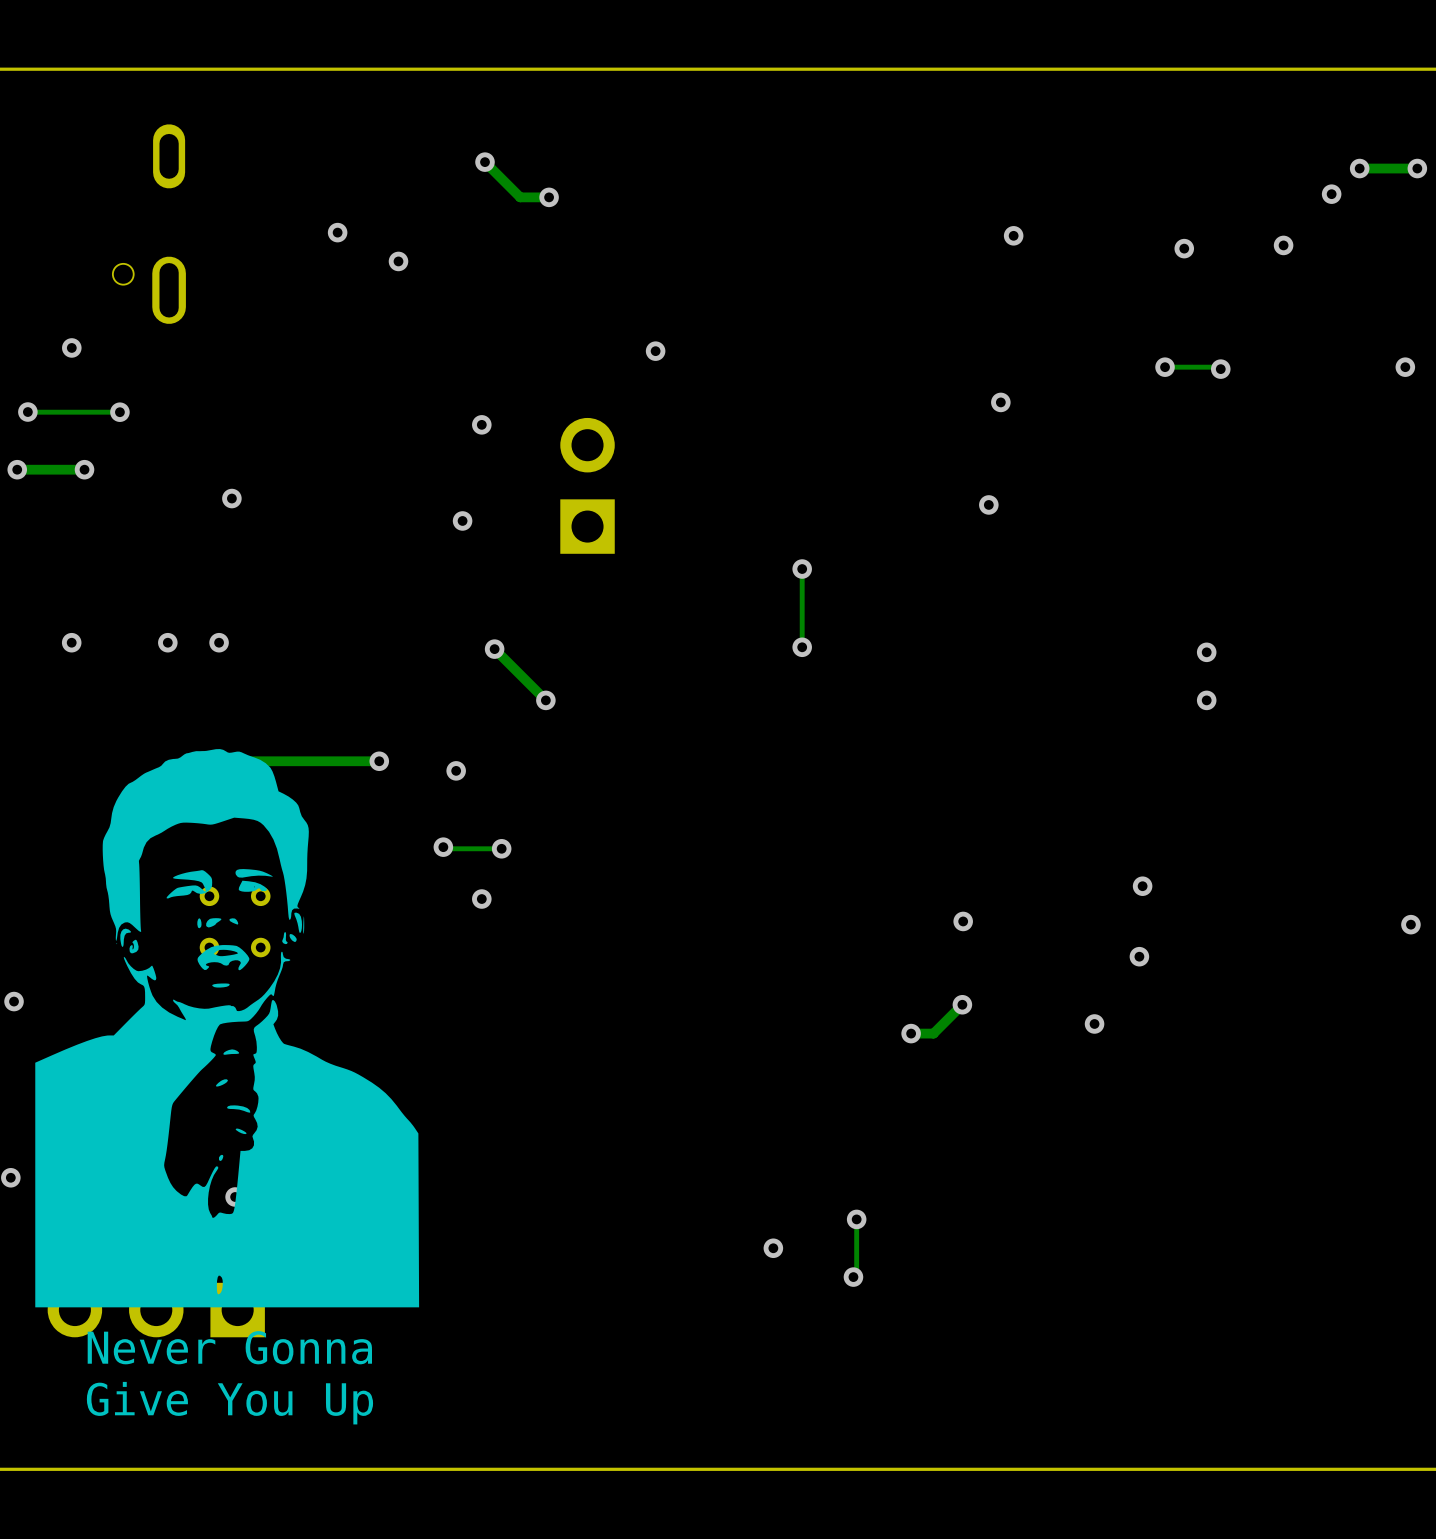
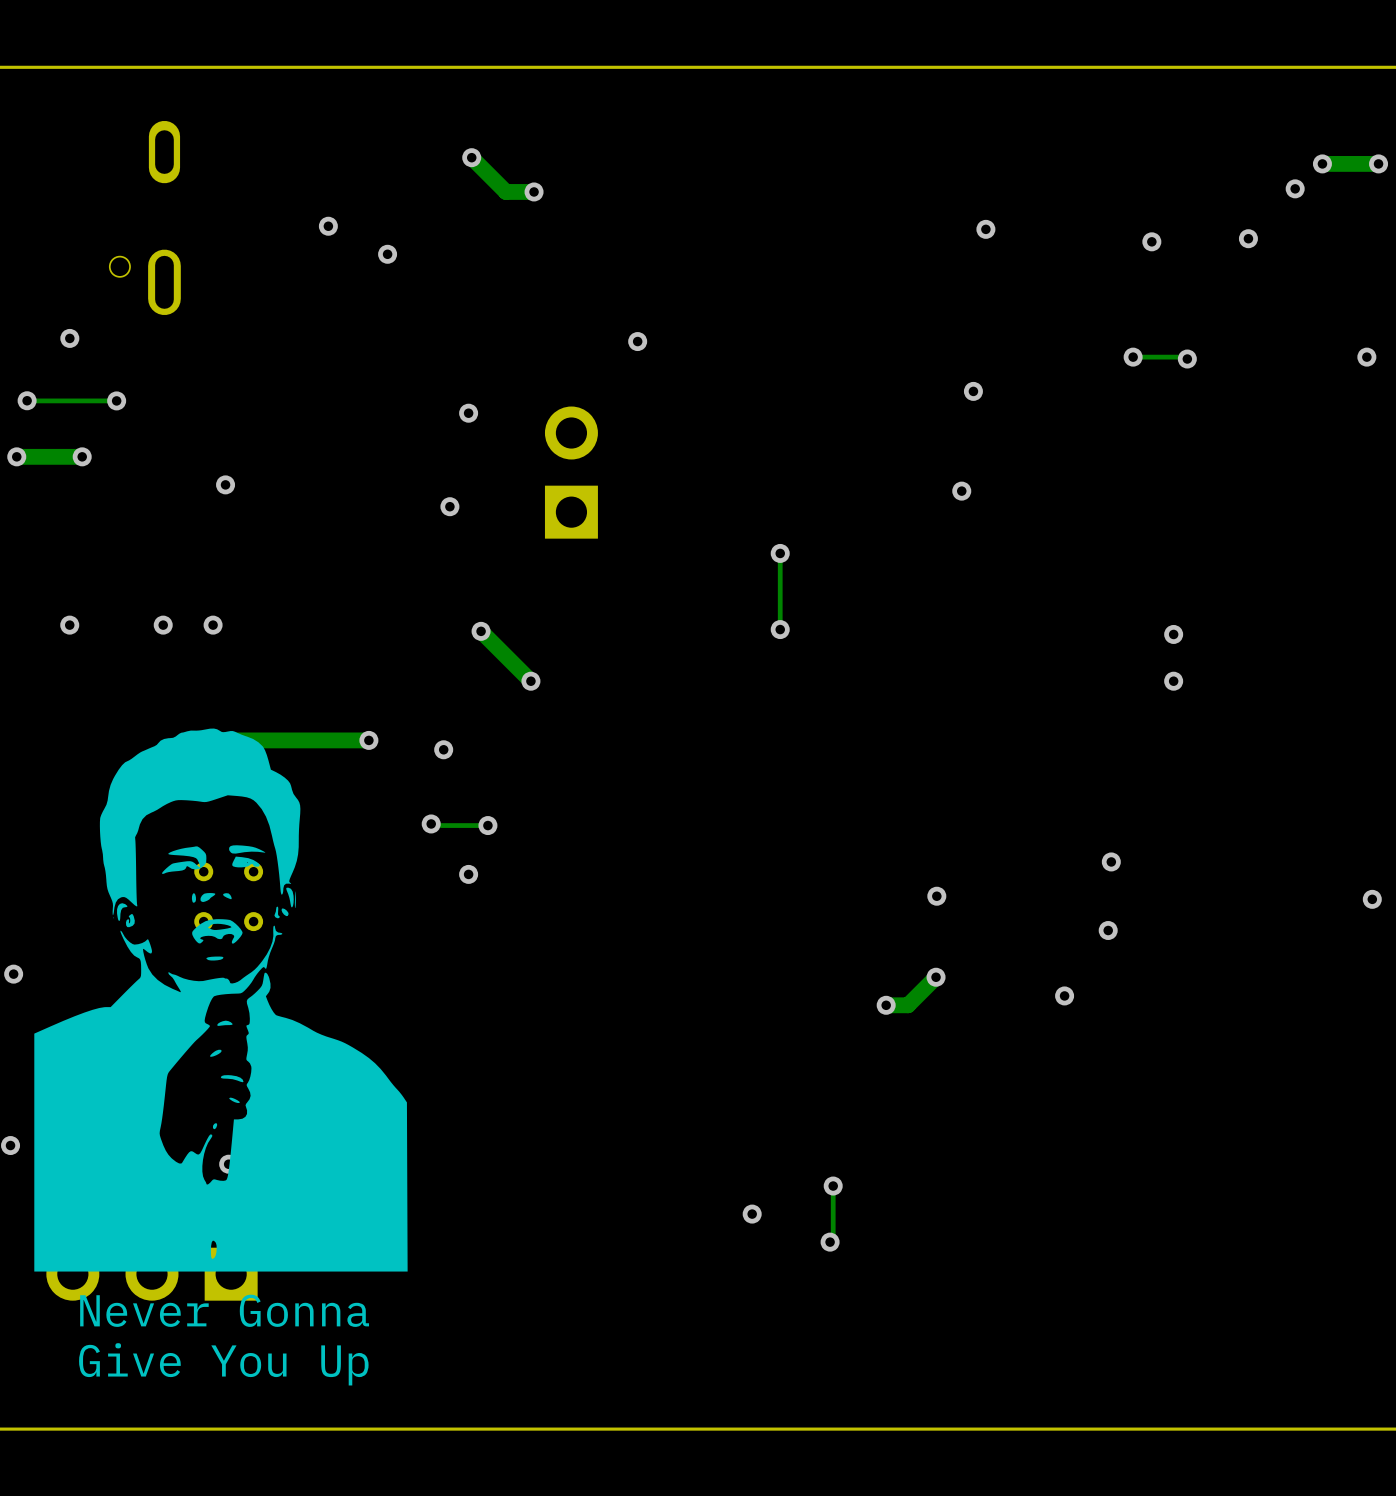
track width: thin (485, 162) (520, 197) (549, 197) -> thick (471, 157) (506, 191) (534, 191)
track width: thin (1417, 168) (1359, 168) -> thick (1378, 163) (1322, 163)
track width: thin (84, 469) (17, 469) -> thick (82, 456) (16, 456)
track width: thin (494, 649) (545, 700) -> thick (481, 631) (530, 681)
track width: thin (379, 761) (203, 761) -> thick (368, 740) (197, 740)
track width: thin (962, 1004) (933, 1033) (911, 1033) -> thick (936, 977) (907, 1005) (886, 1005)

